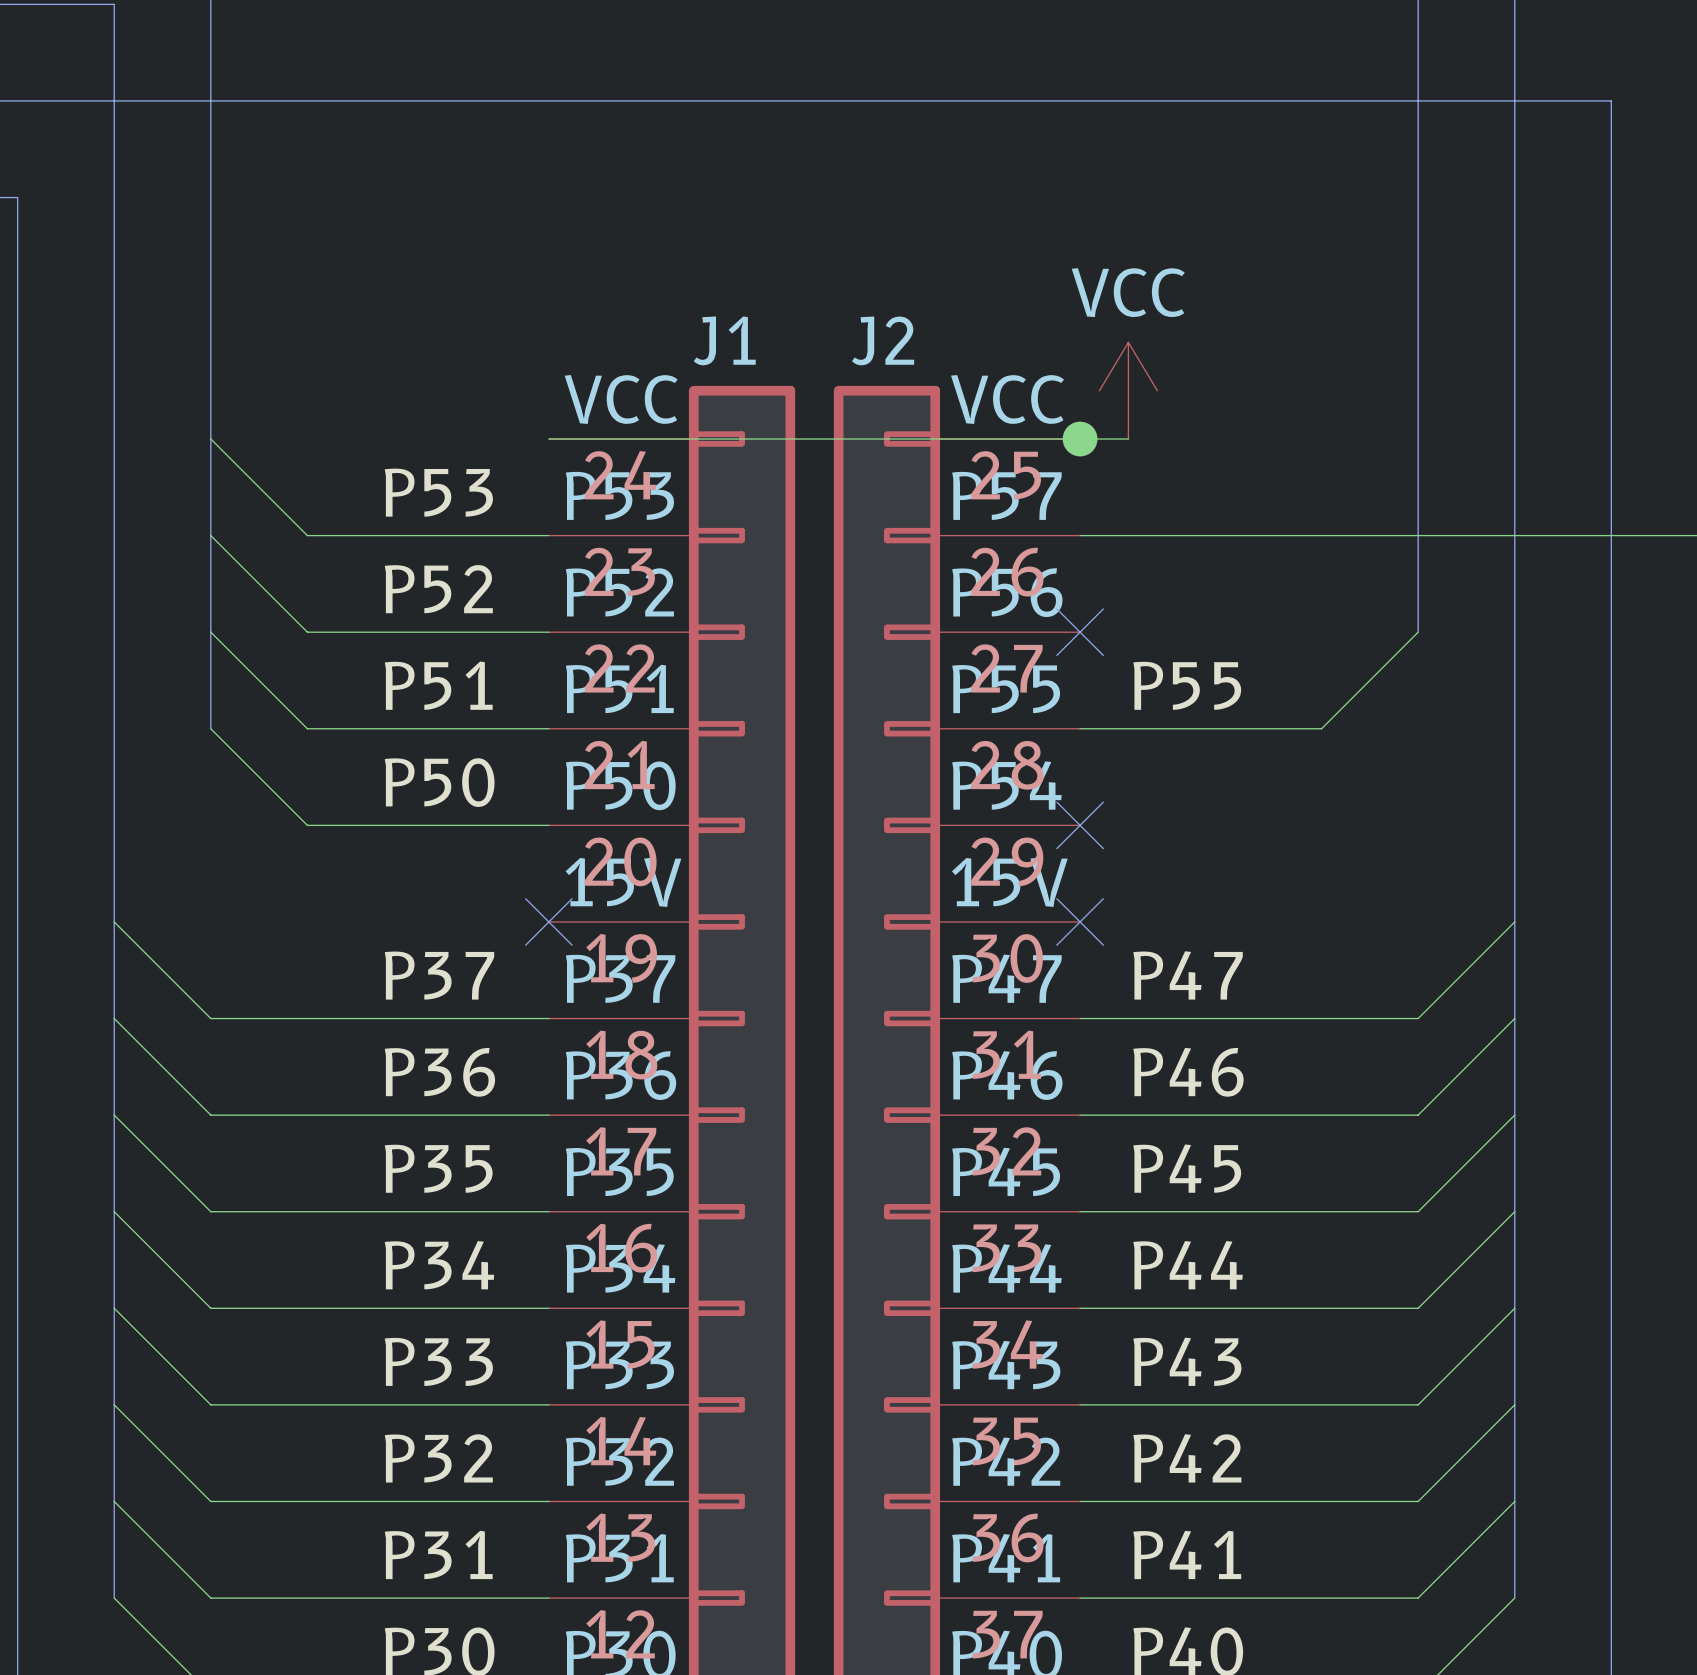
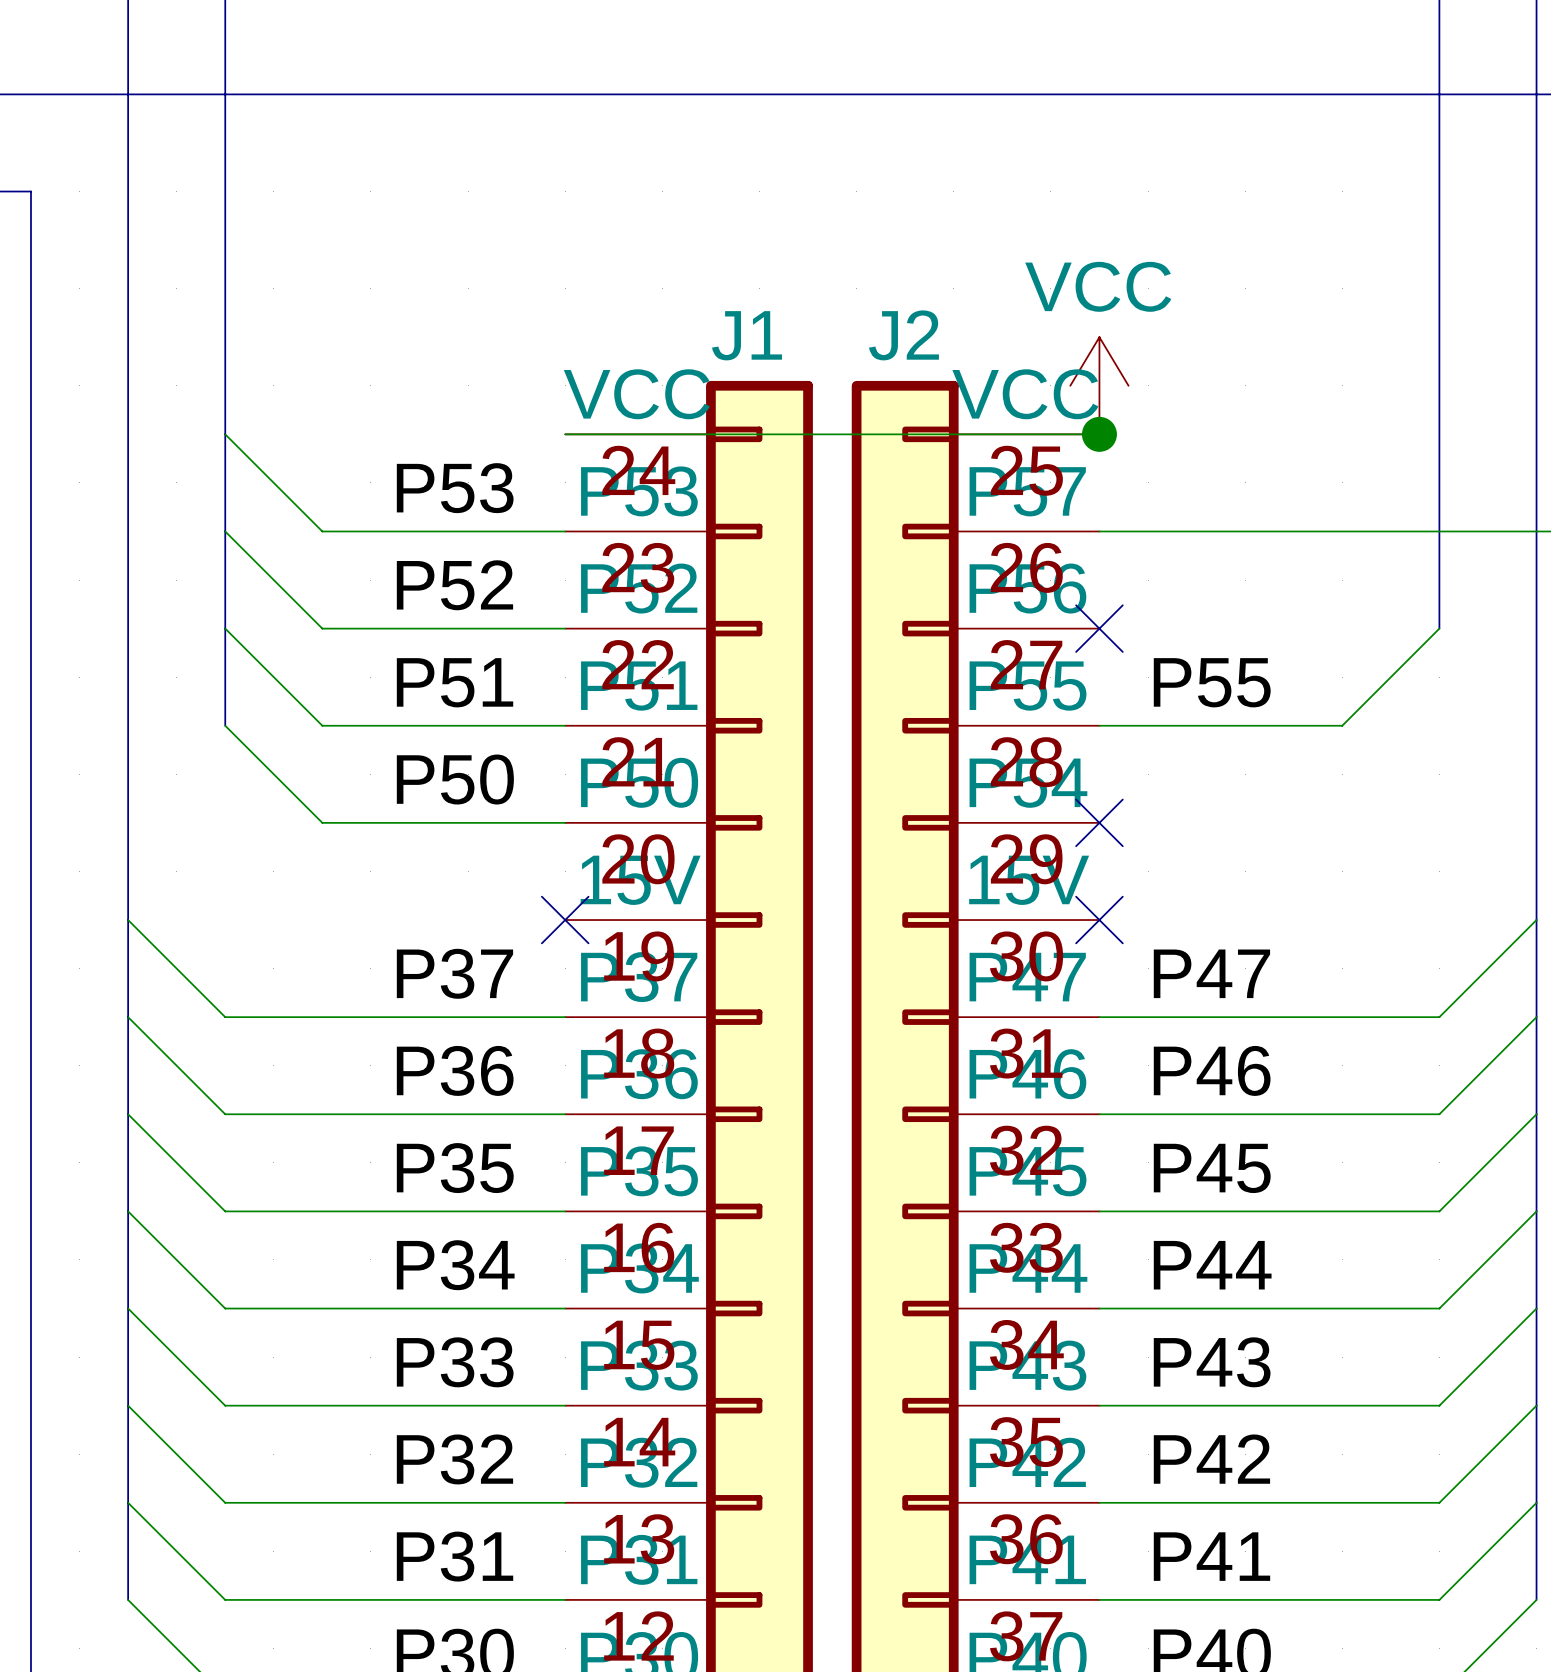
power symbol position: VCC (1128, 390) -> VCC (1099, 385)
wire: (1080, 439) (1128, 439) -> none

